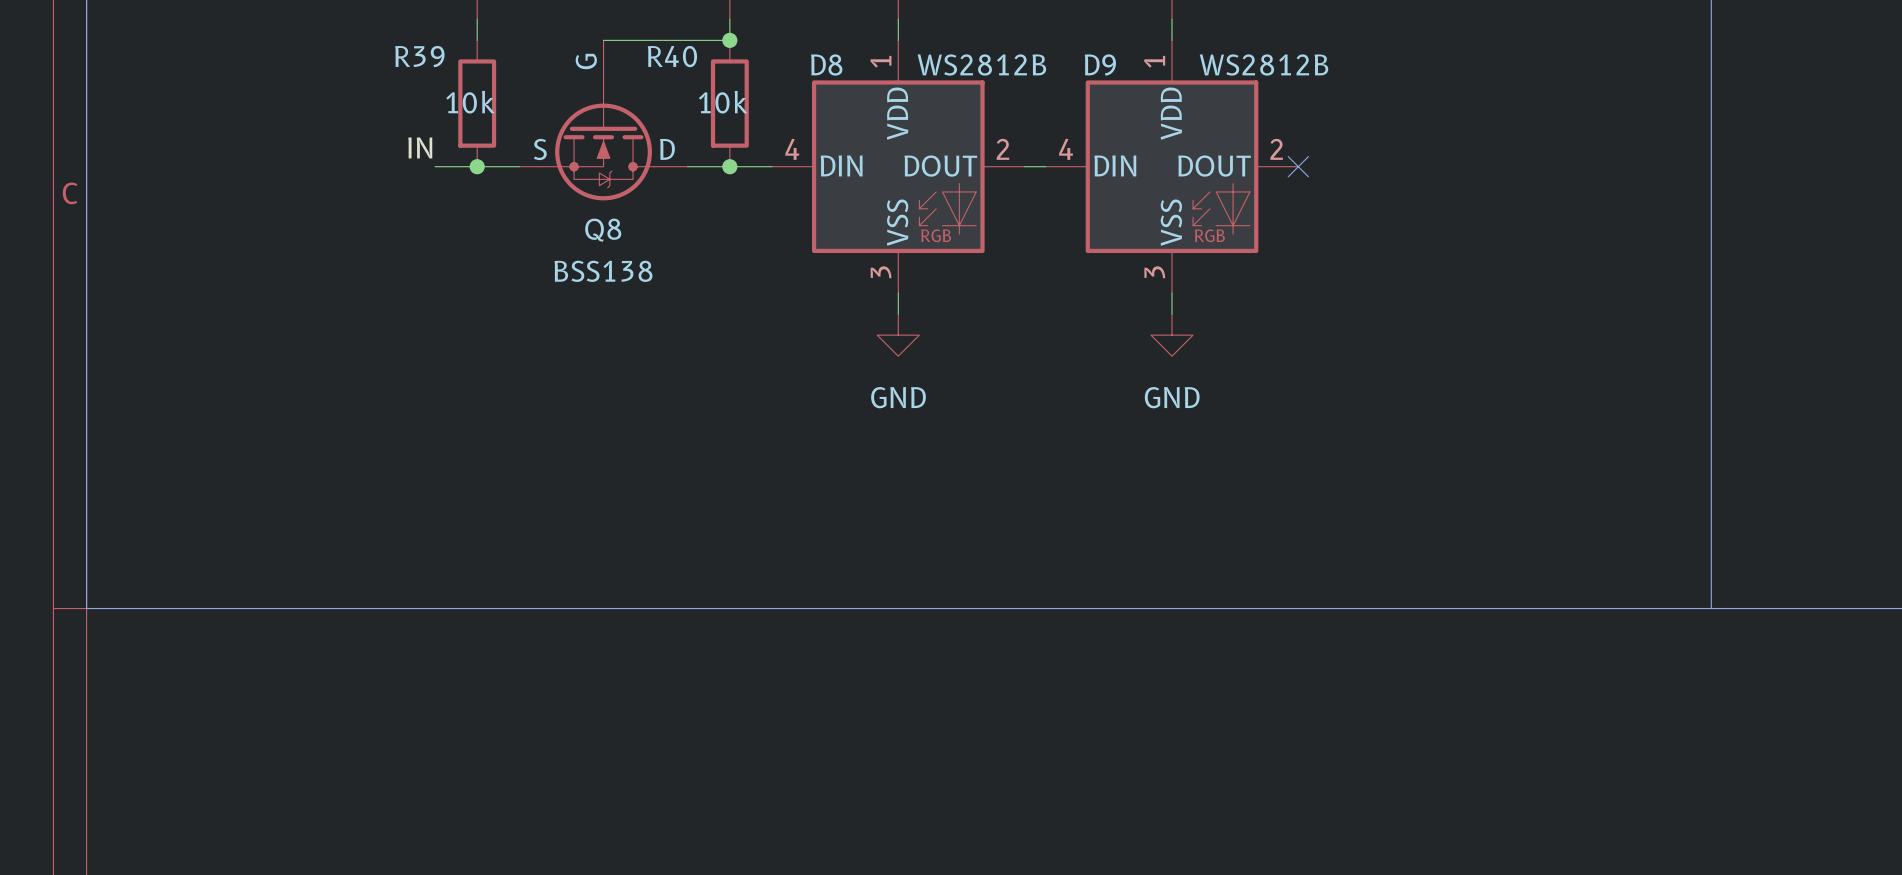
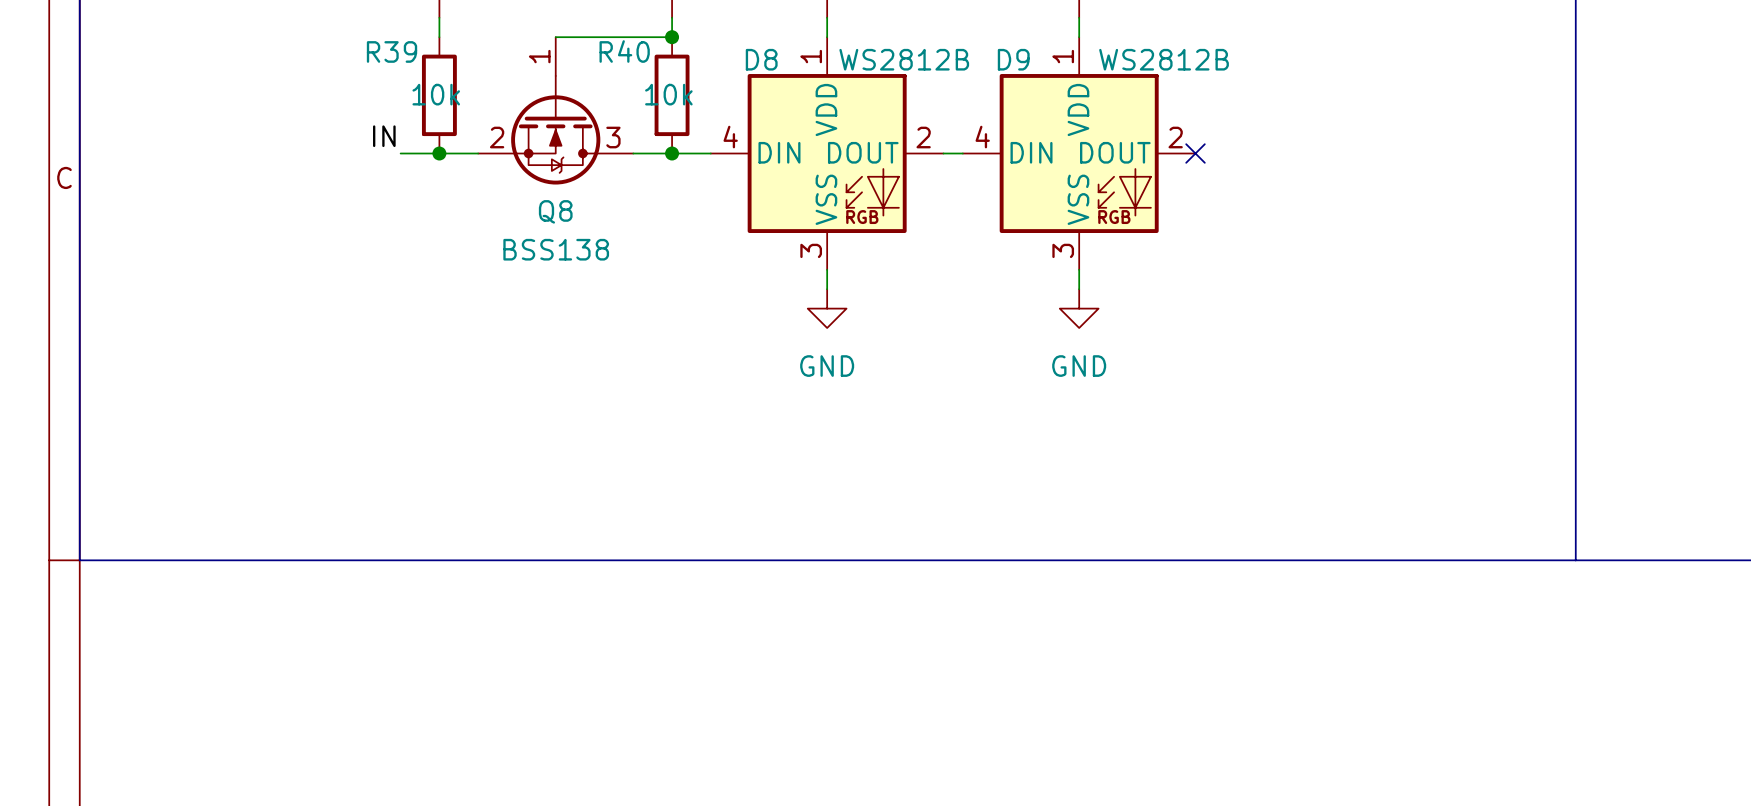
Q8 pin name: G (586, 61) -> none
Q8 pin number: none -> 1 (539, 56)
Q8 pin number: none -> 2 (497, 137)
Q8 pin name: S (540, 149) -> none
Q8 pin number: none -> 3 (613, 137)
Q8 pin name: D (667, 149) -> none

